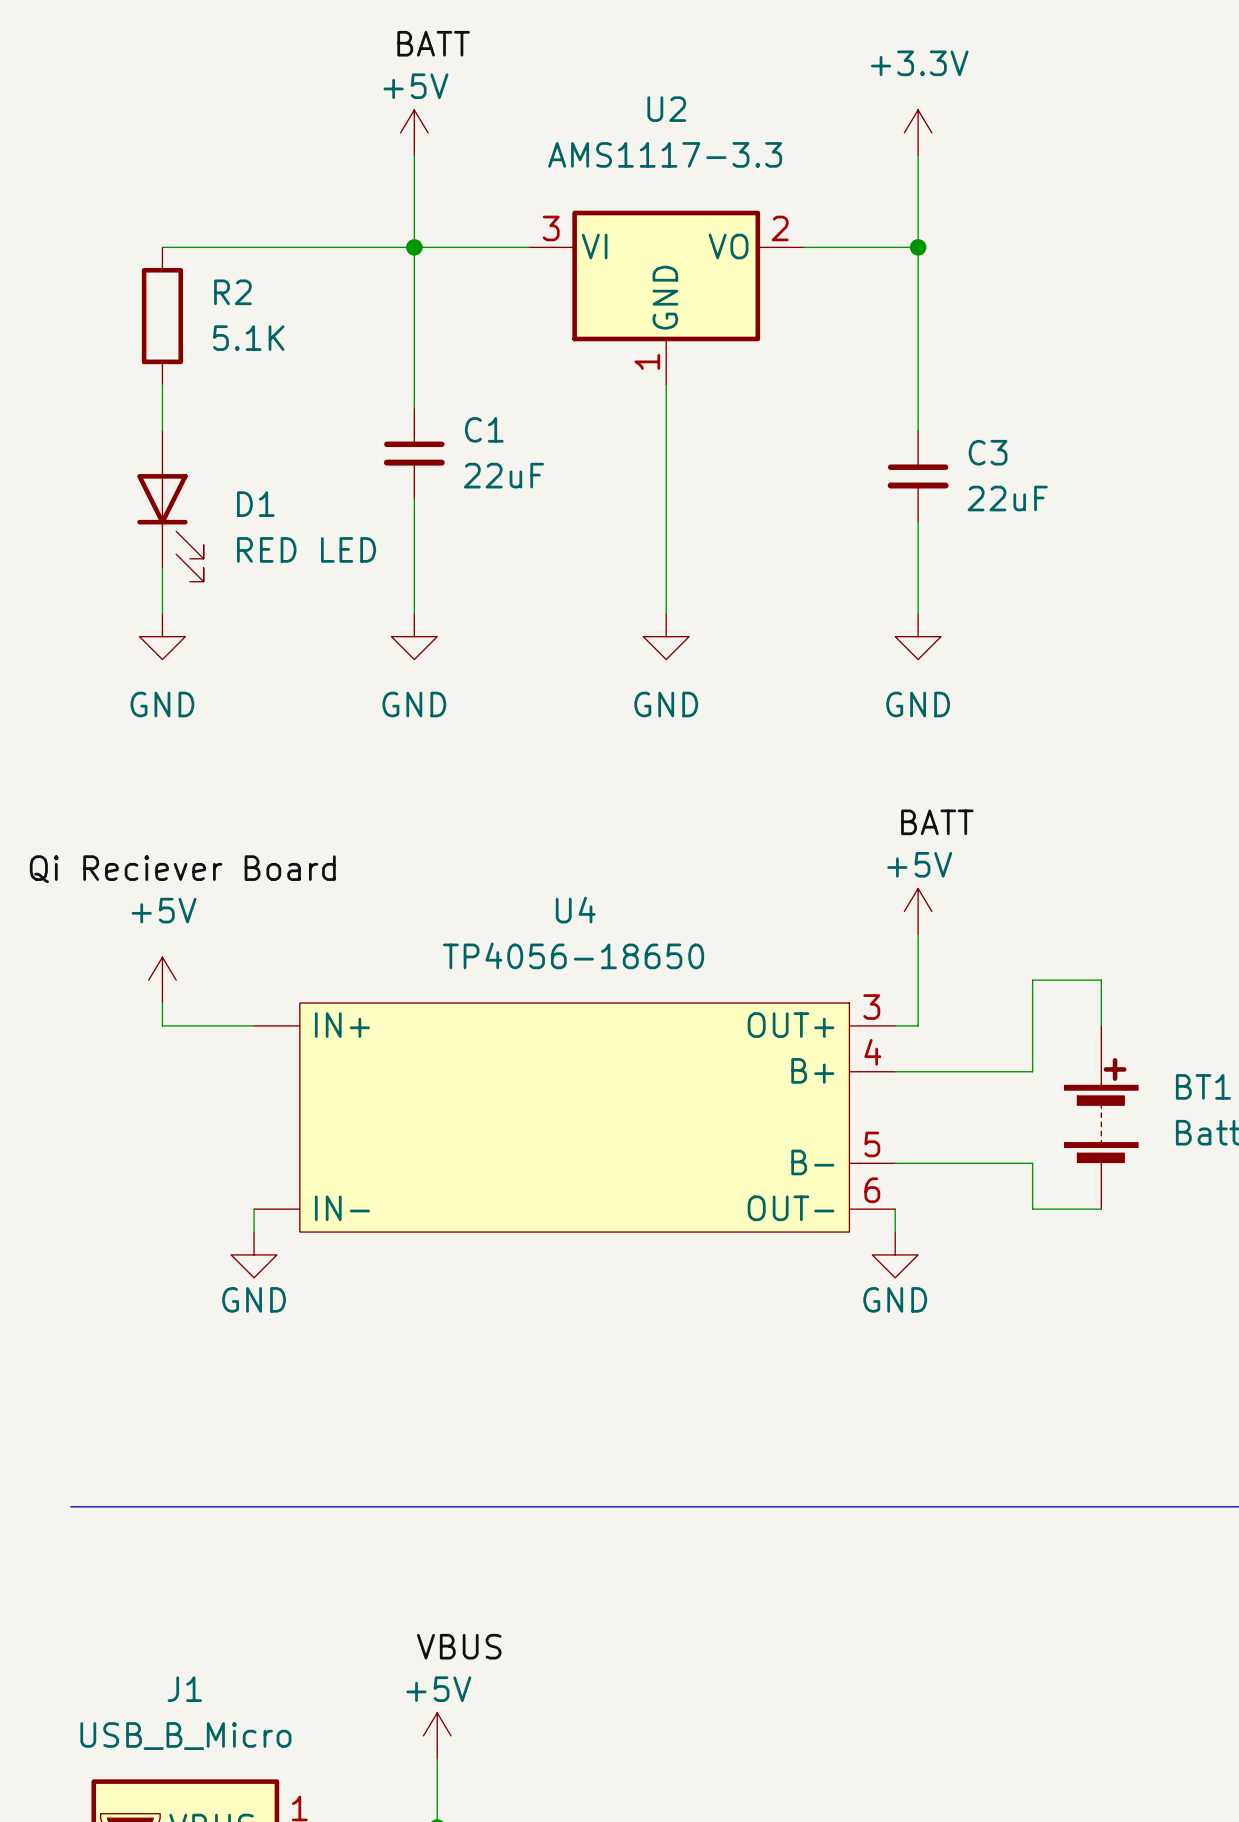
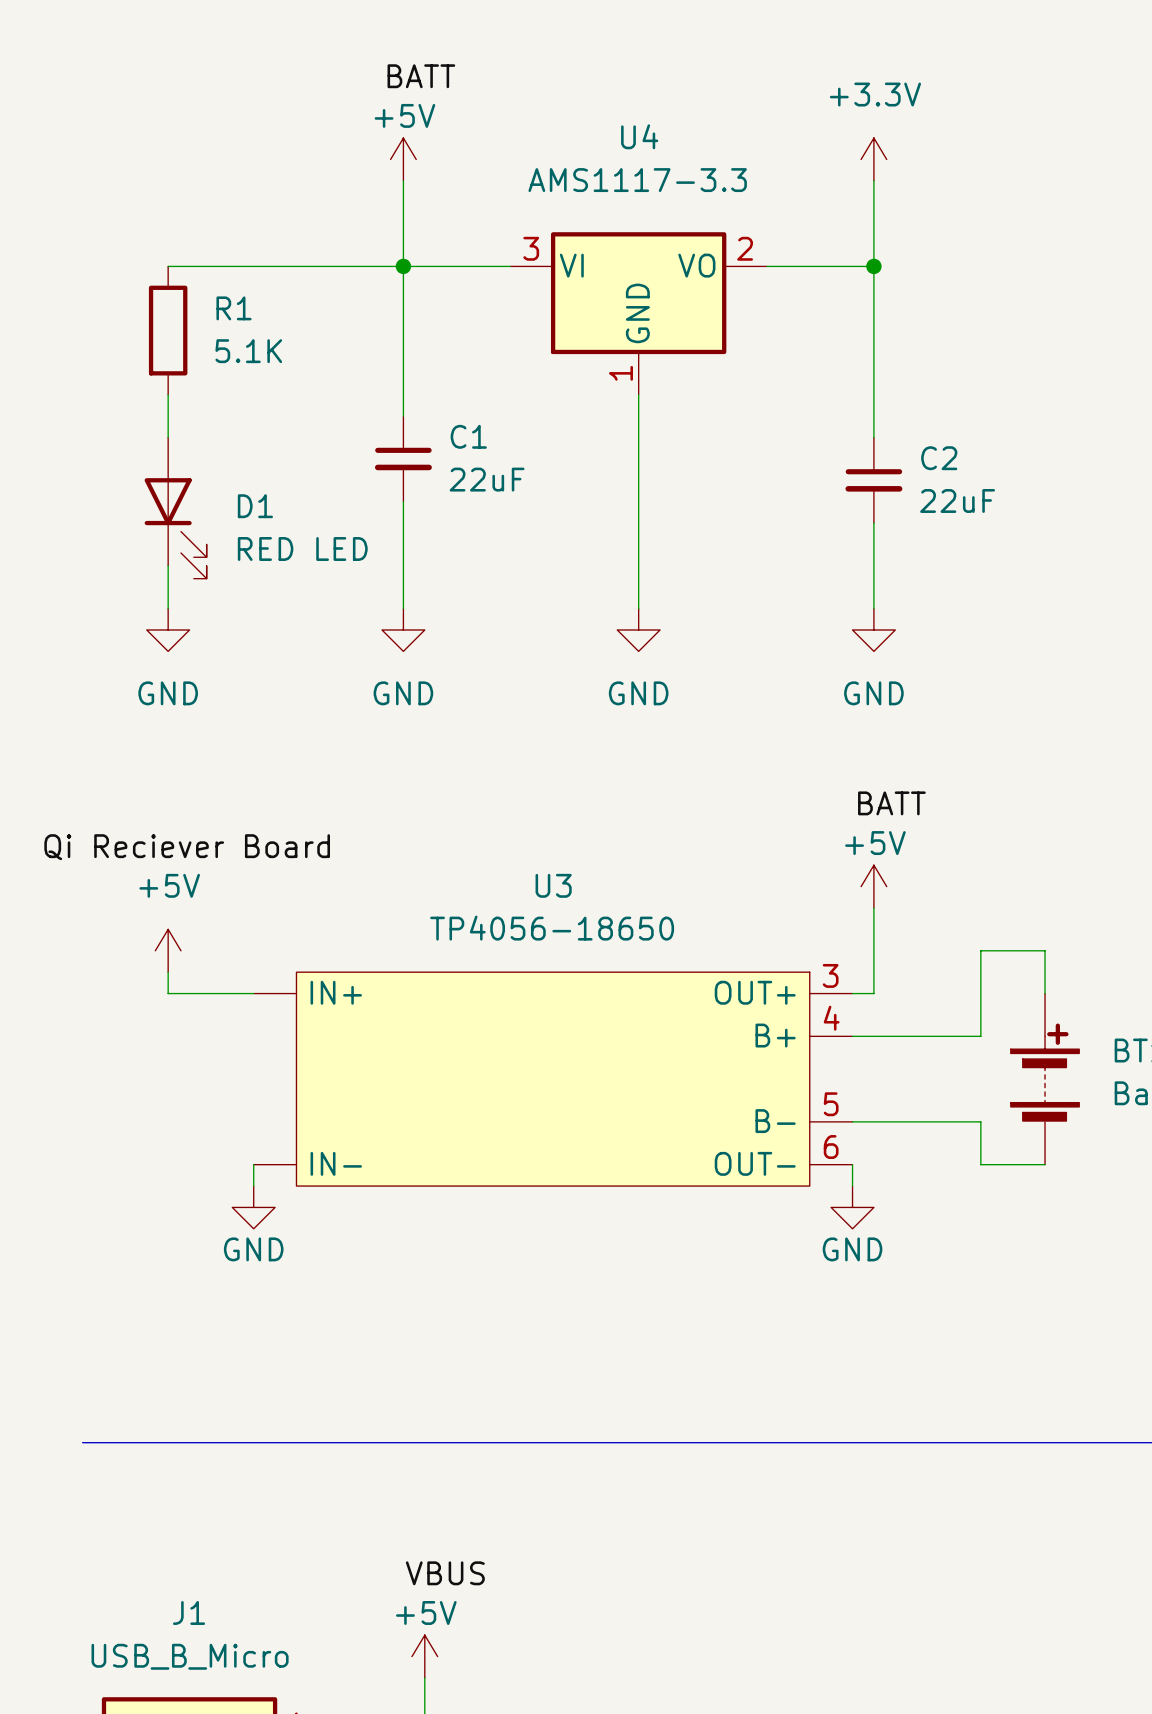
U2 name: U2 (666, 109) -> U4 (639, 136)
R2 name: R2 (232, 292) -> R1 (234, 308)
C3 name: C3 (988, 452) -> C2 (939, 458)
U4 name: U4 (575, 910) -> U3 (553, 885)

